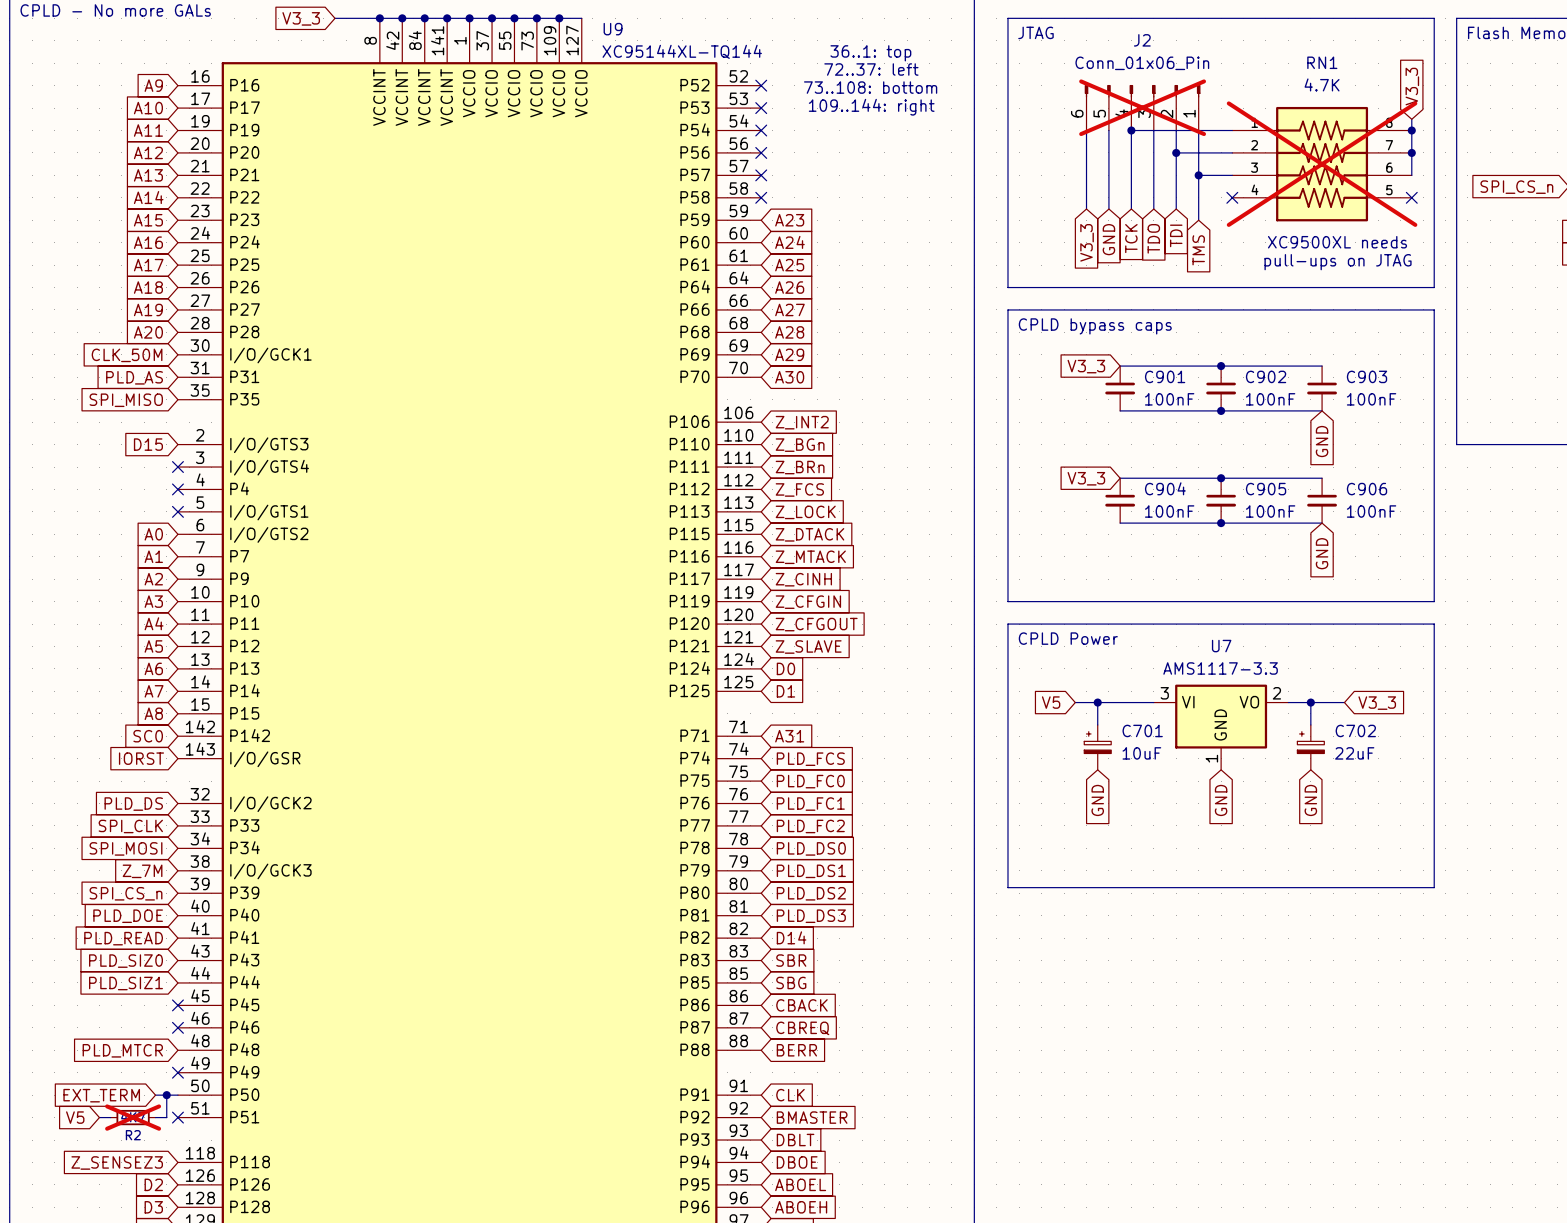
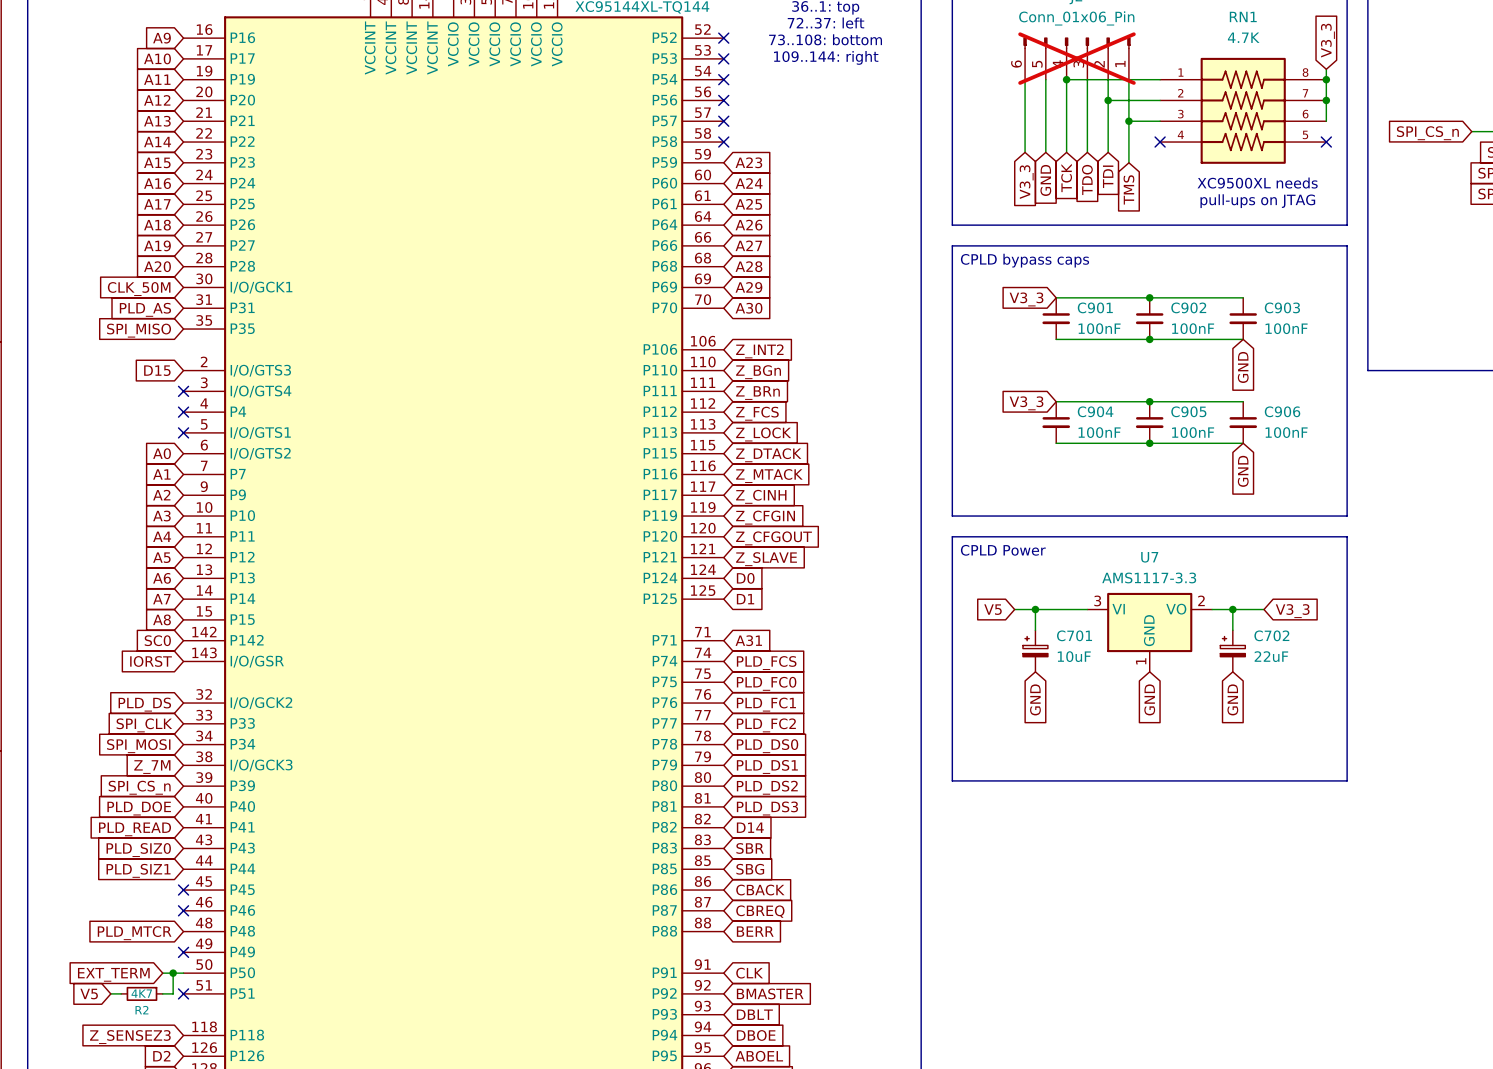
RN1 do-not-place cross: (1322, 164) -> none
R2 do-not-place cross: (133, 1117) -> none

